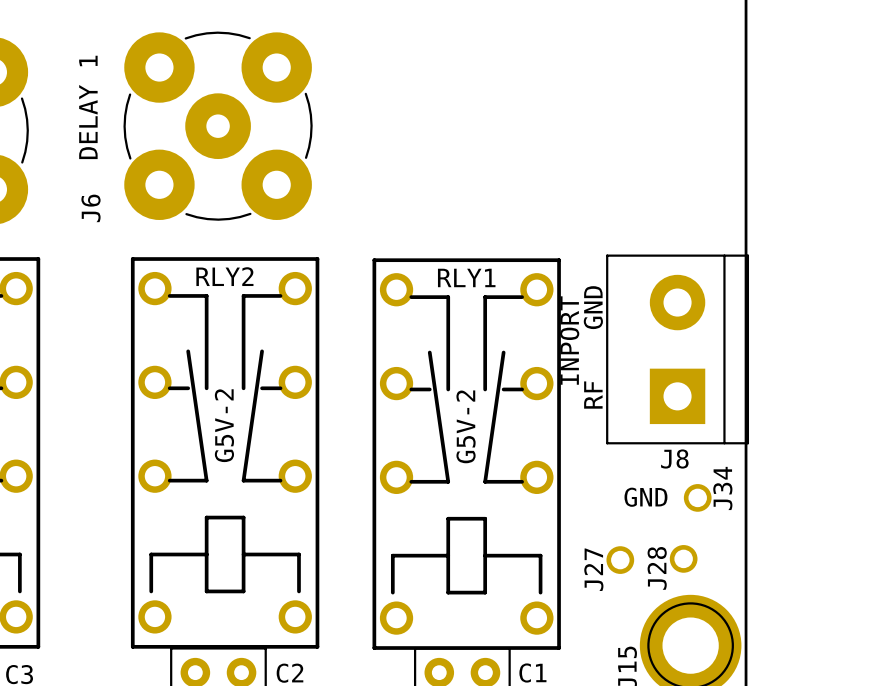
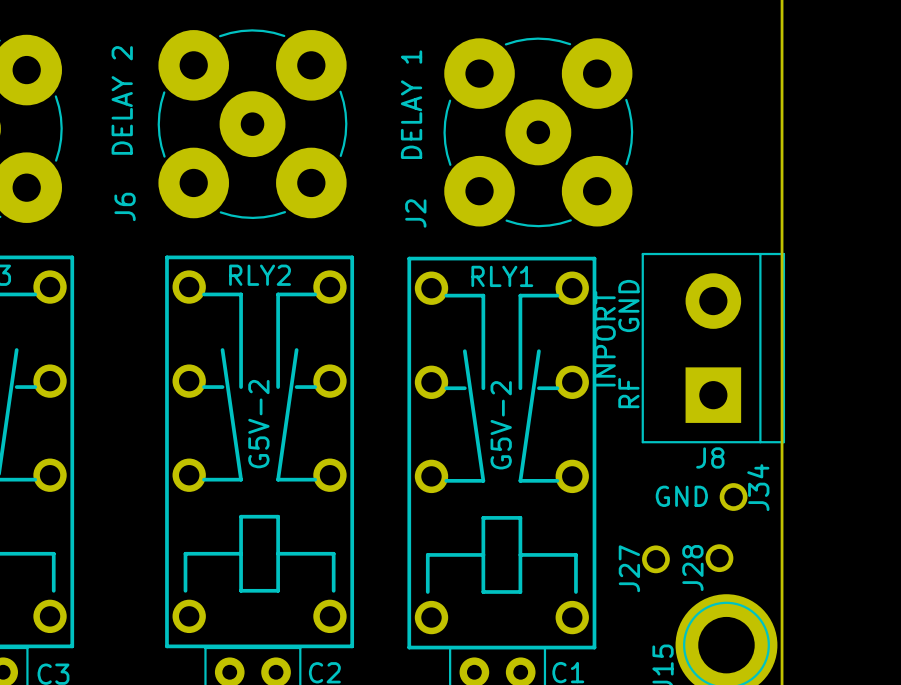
text: DELAY 1 (88, 107) -> DELAY 2 (122, 100)
text: none -> DELAY 1 (411, 104)
J2: none -> (538, 132)

